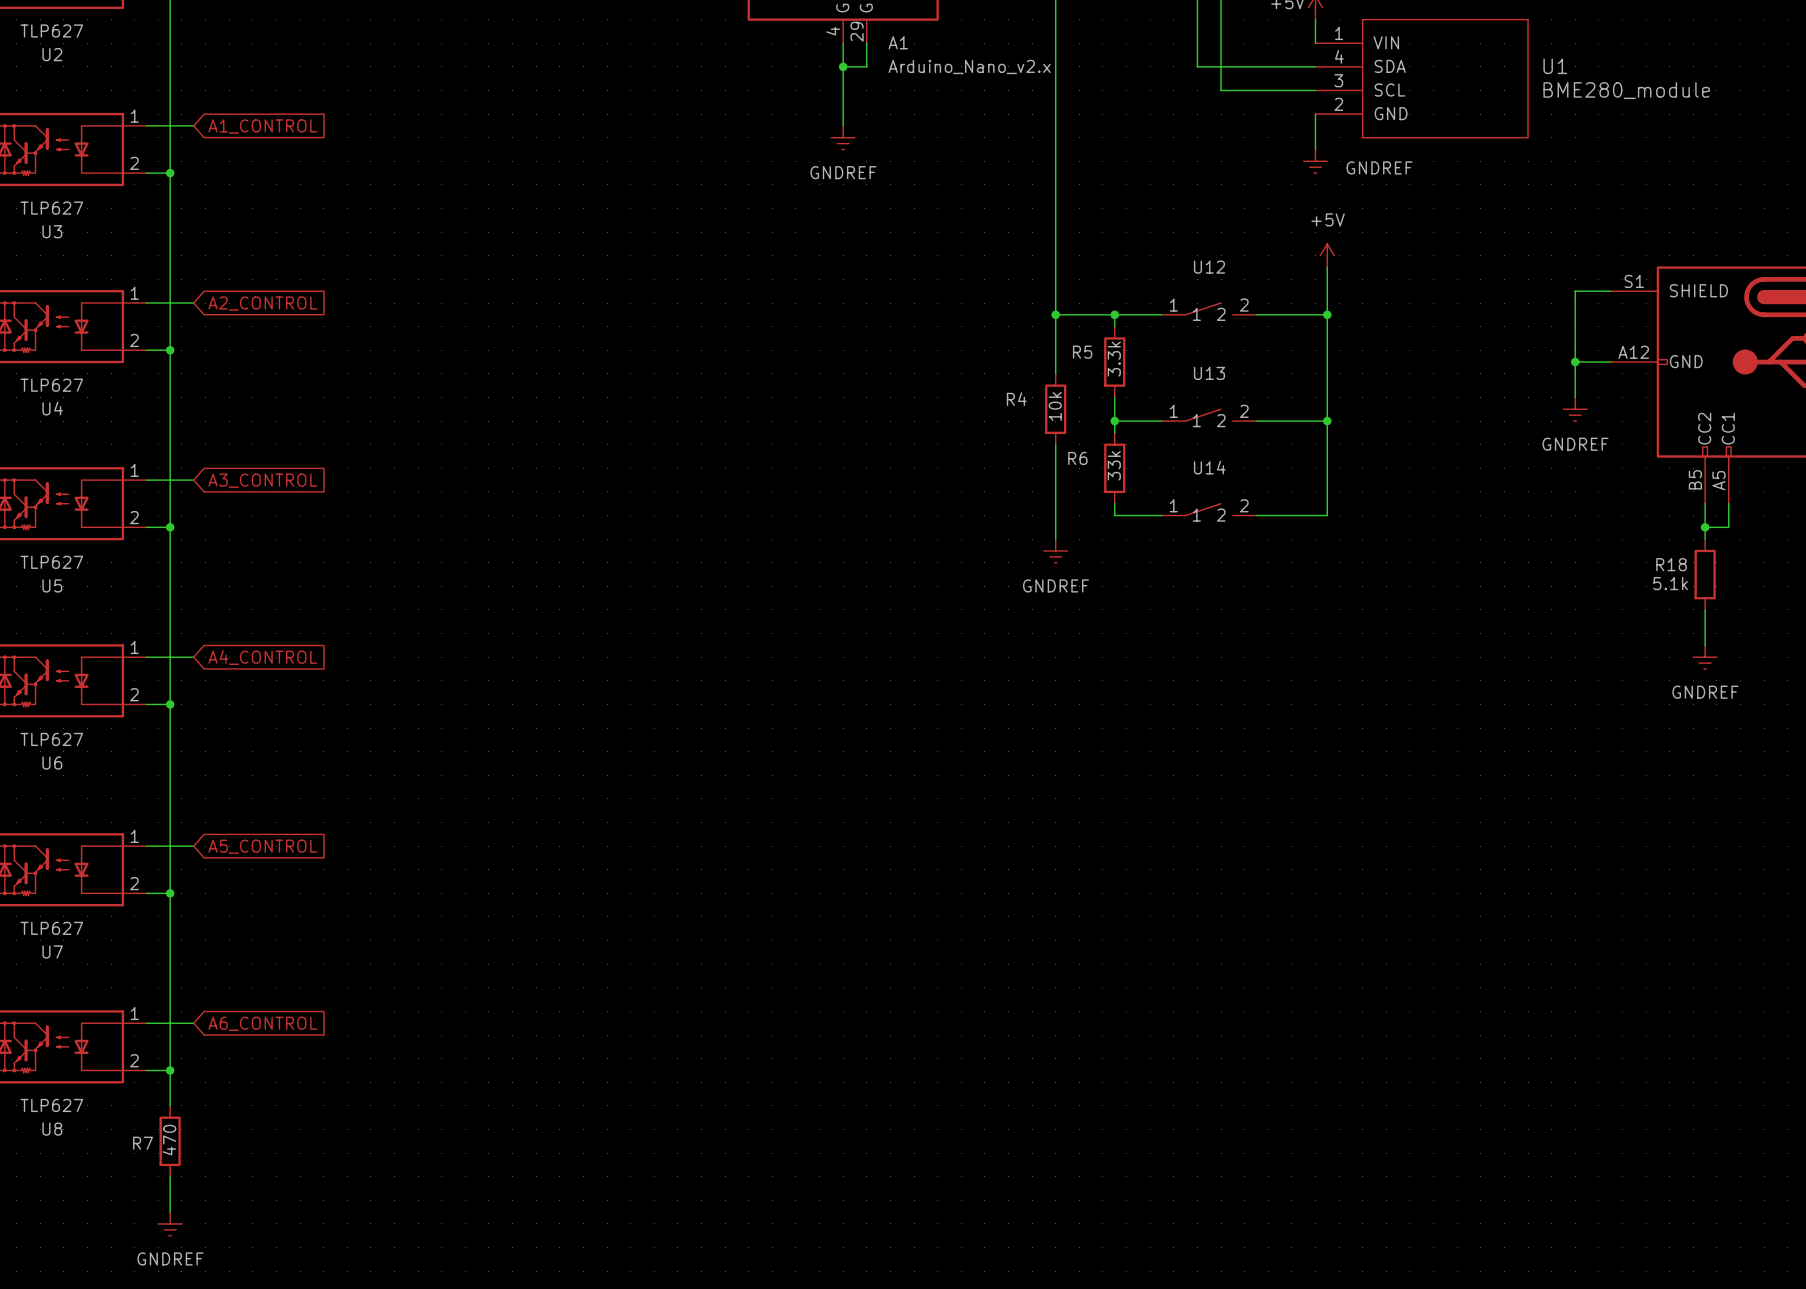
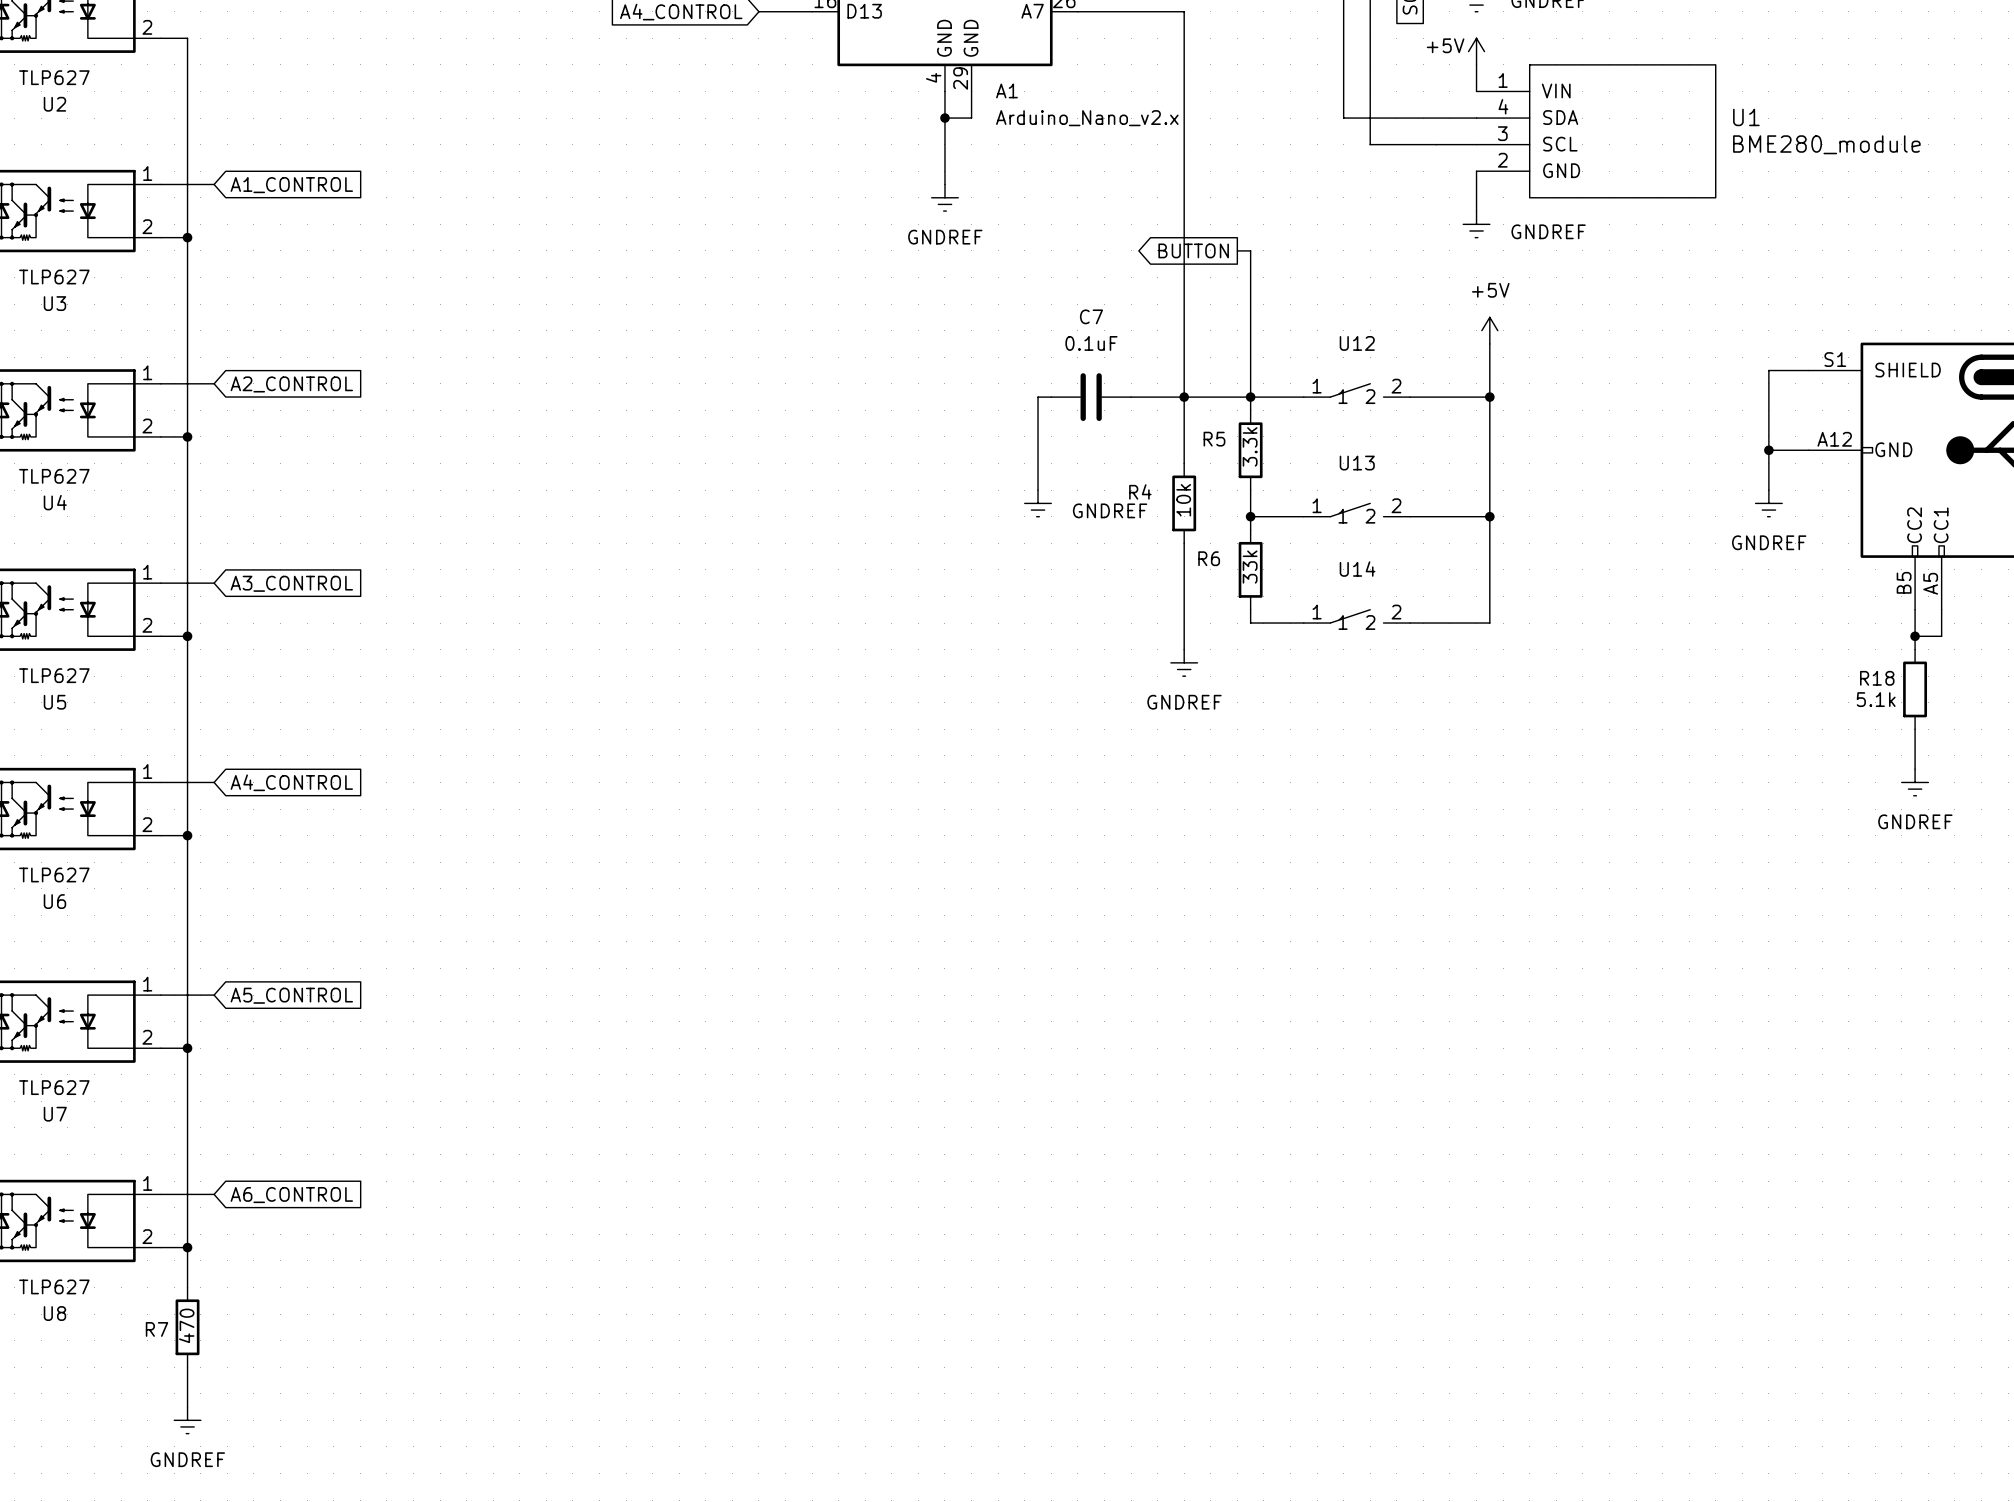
global label: none -> BUTTON (1193, 250)
wire: none -> (1237, 250) (1250, 250) (1250, 397)
wire: none -> (1051, 397) (1038, 397) (1038, 490)
C7: none -> 0.1uF (1091, 397)
wire: none -> (1131, 397) (1184, 397)
power symbol: none -> GNDREF (1038, 503)

